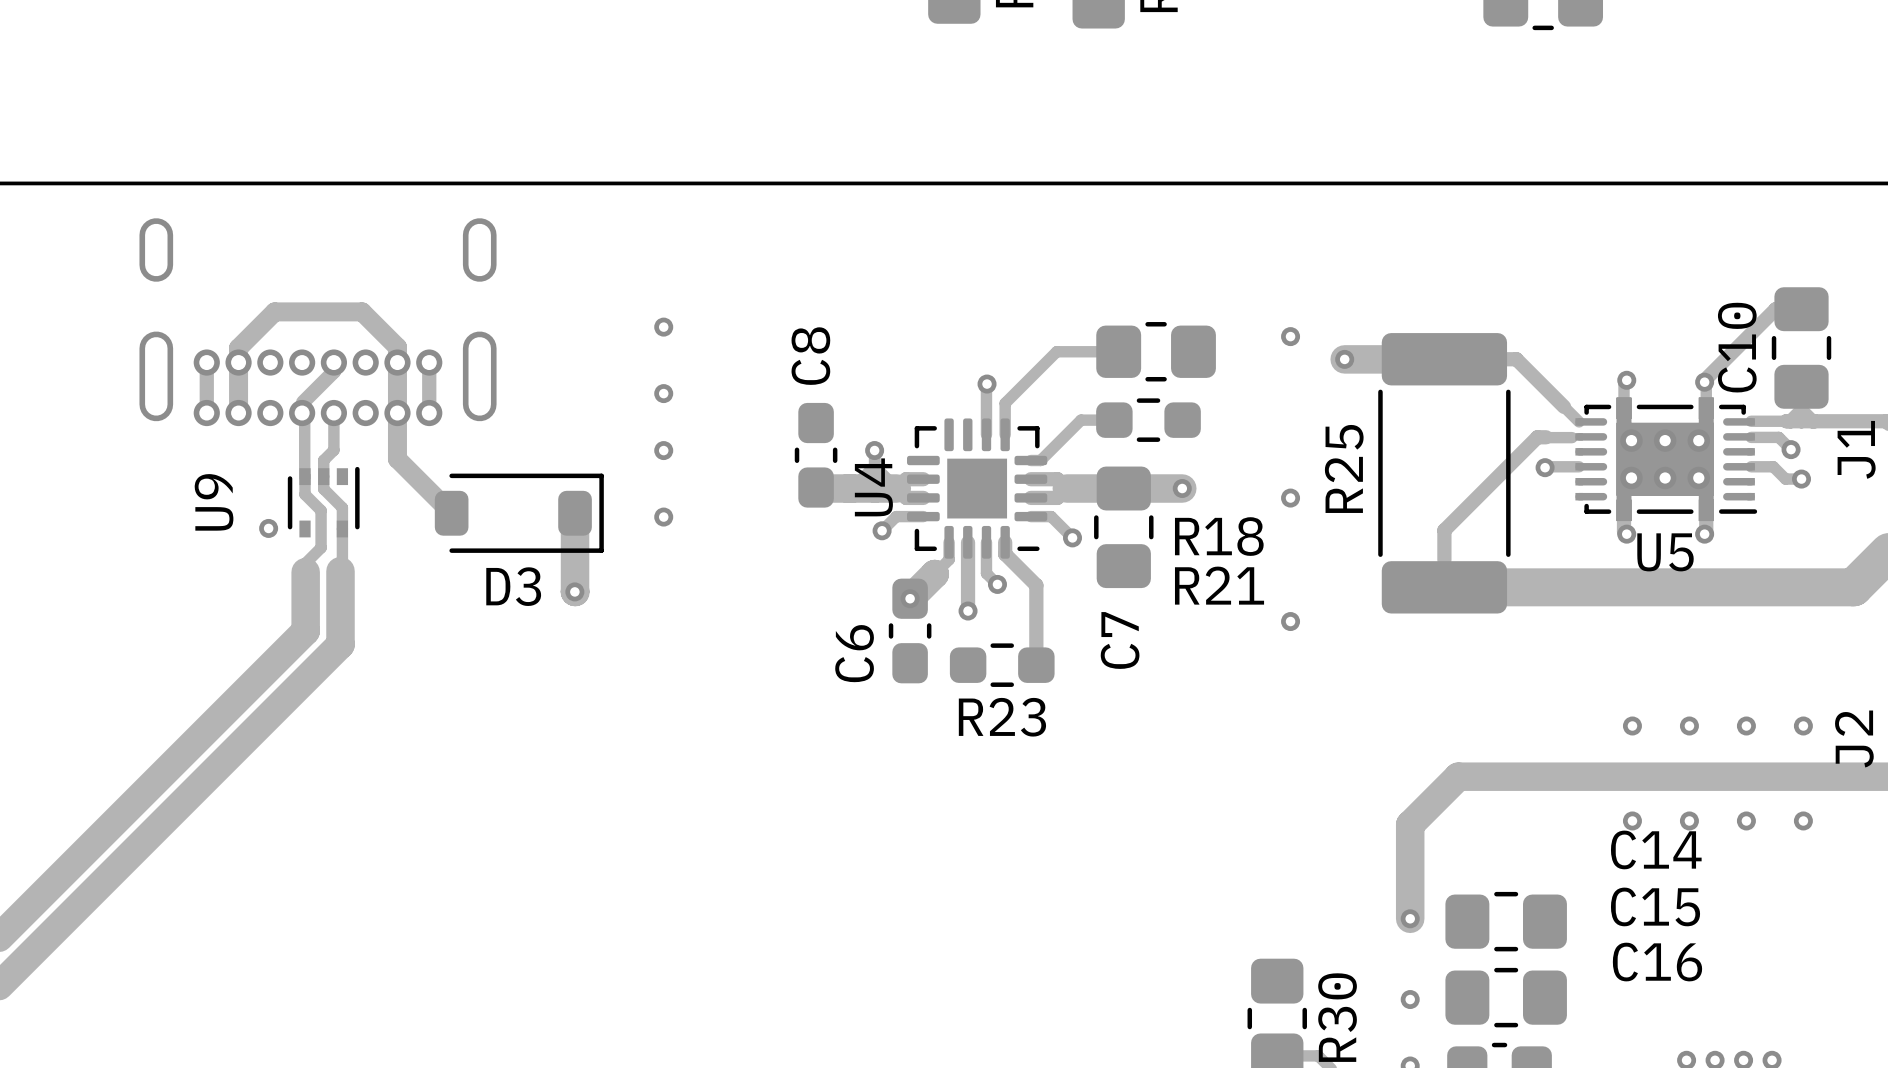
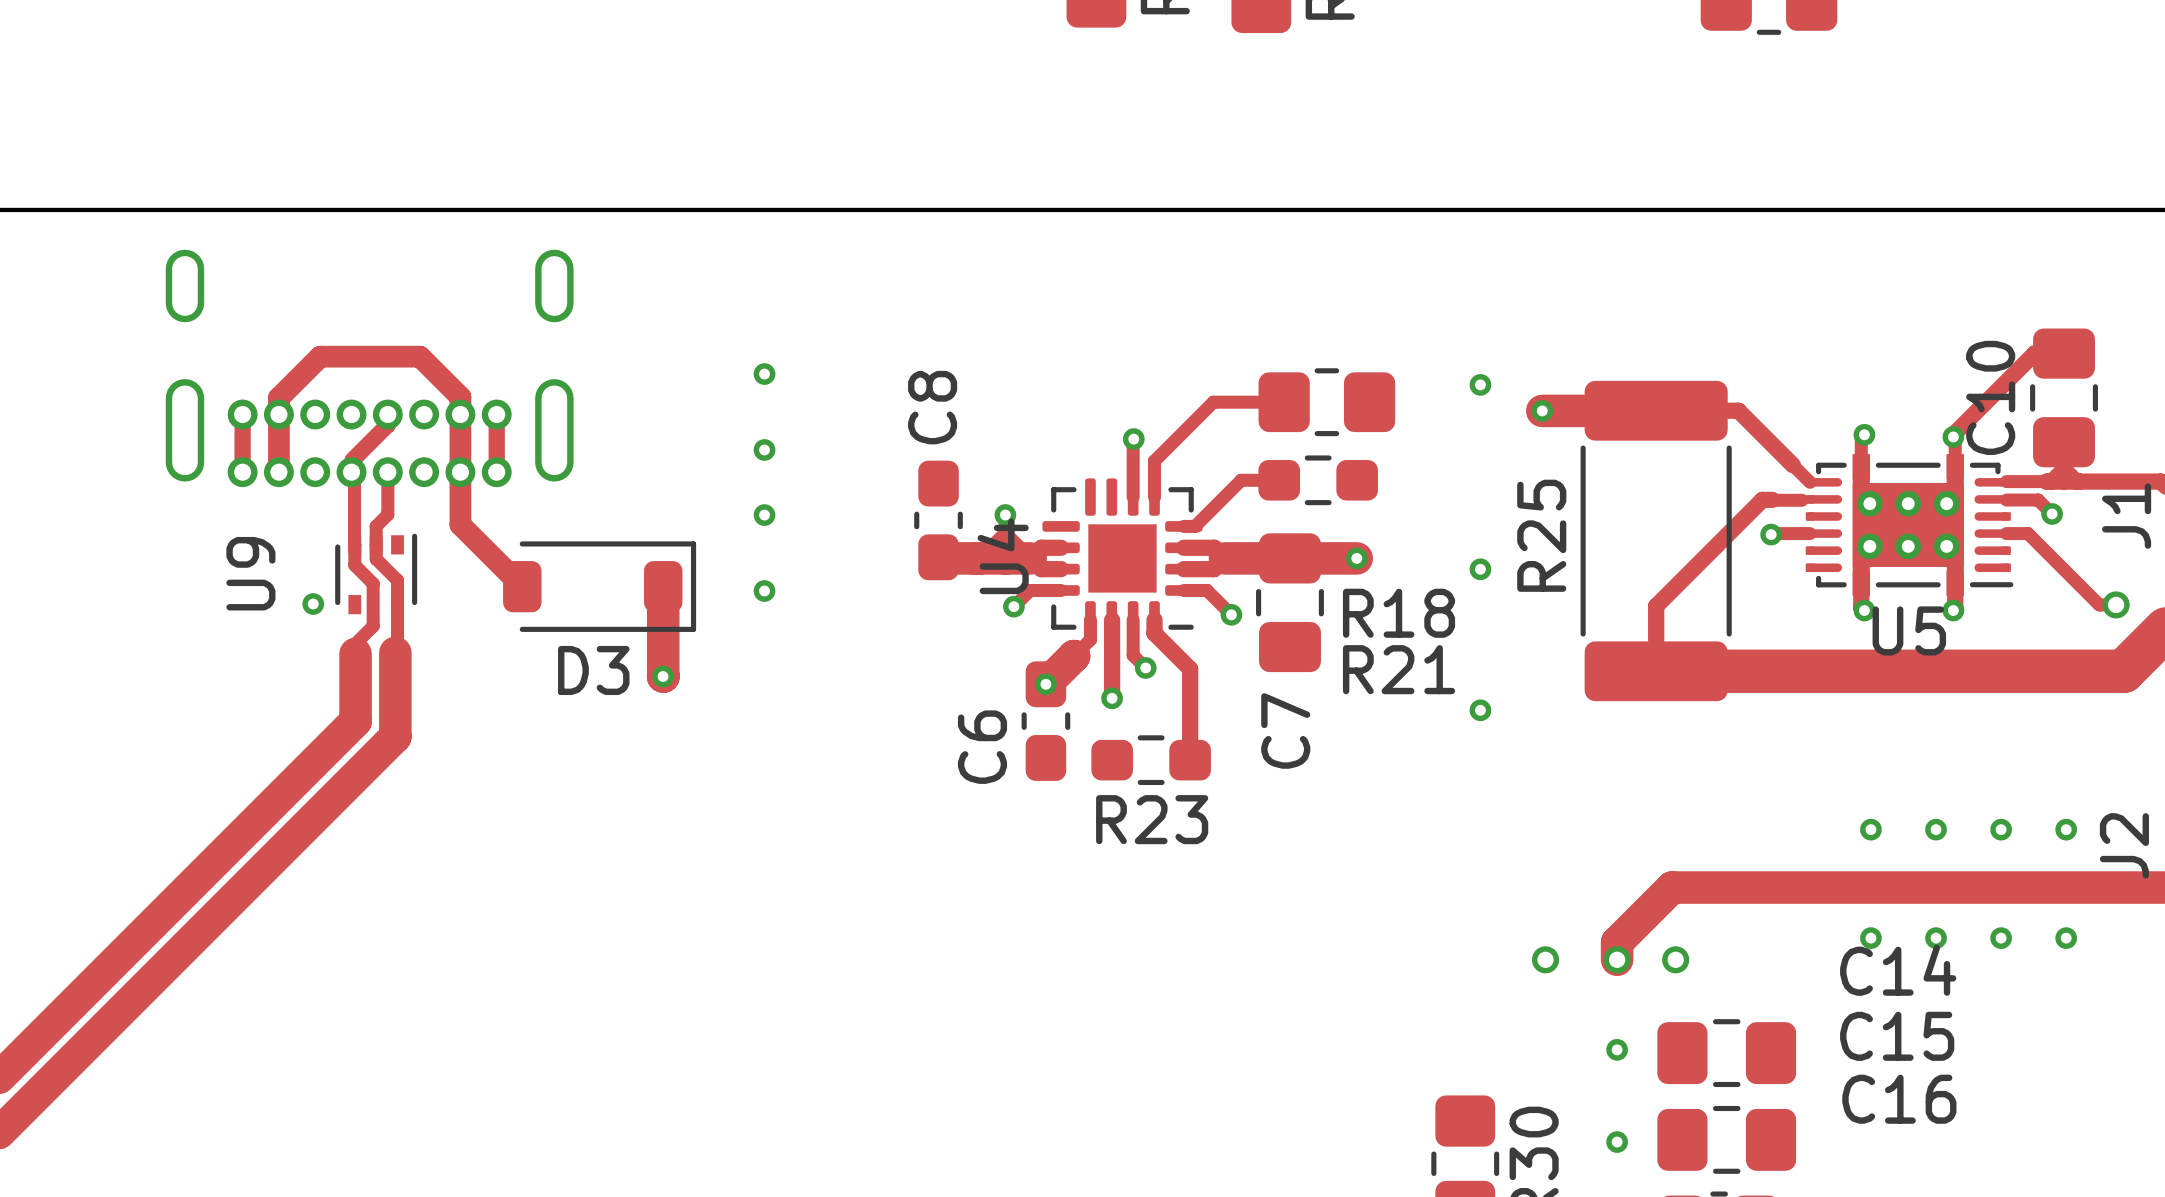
track: (1769, 466) (1773, 466) (1785, 479) (1801, 479) -> (2027, 533) (2099, 604) (2116, 604)
via: (1801, 479) -> none
via: none -> (2116, 604)
via: none -> (1545, 959)
track: (1410, 839) (1410, 918) -> none
via: none -> (1617, 959)
via: none -> (1675, 959)

